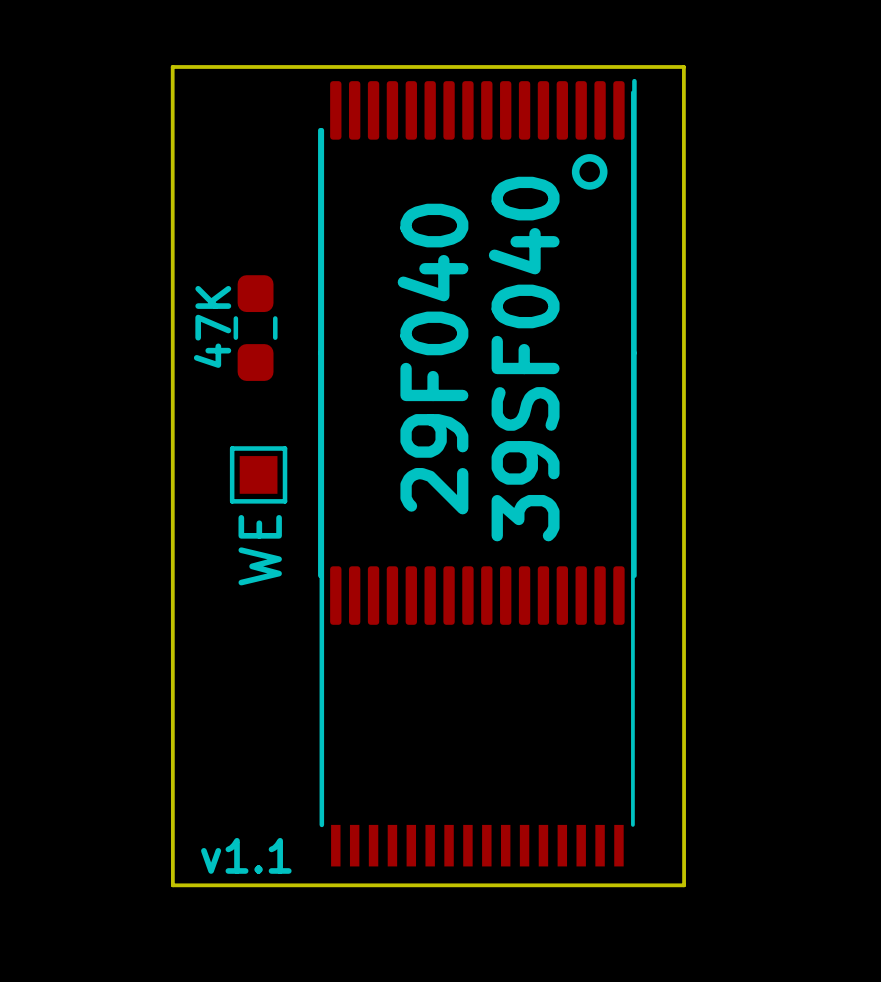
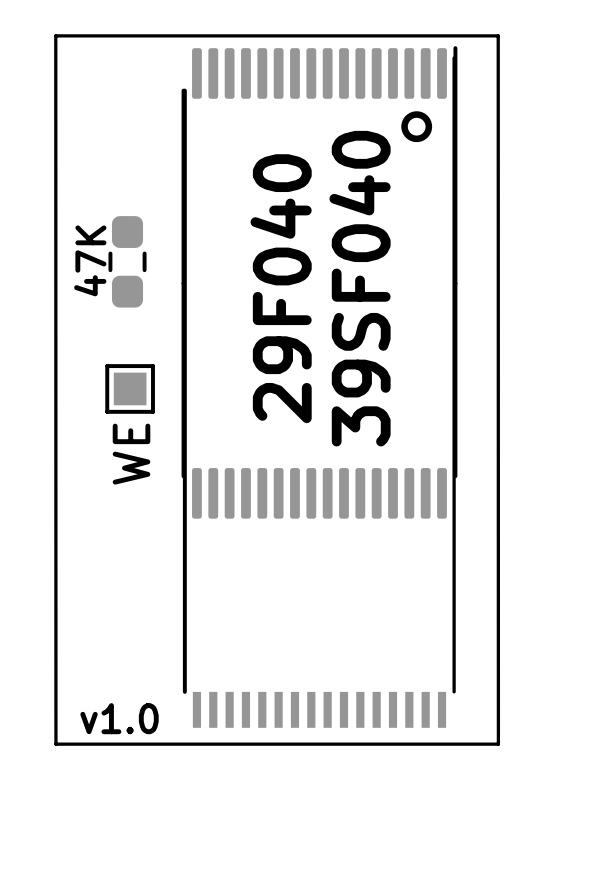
text: v1.1 (246, 855) -> v1.0 (119, 718)

